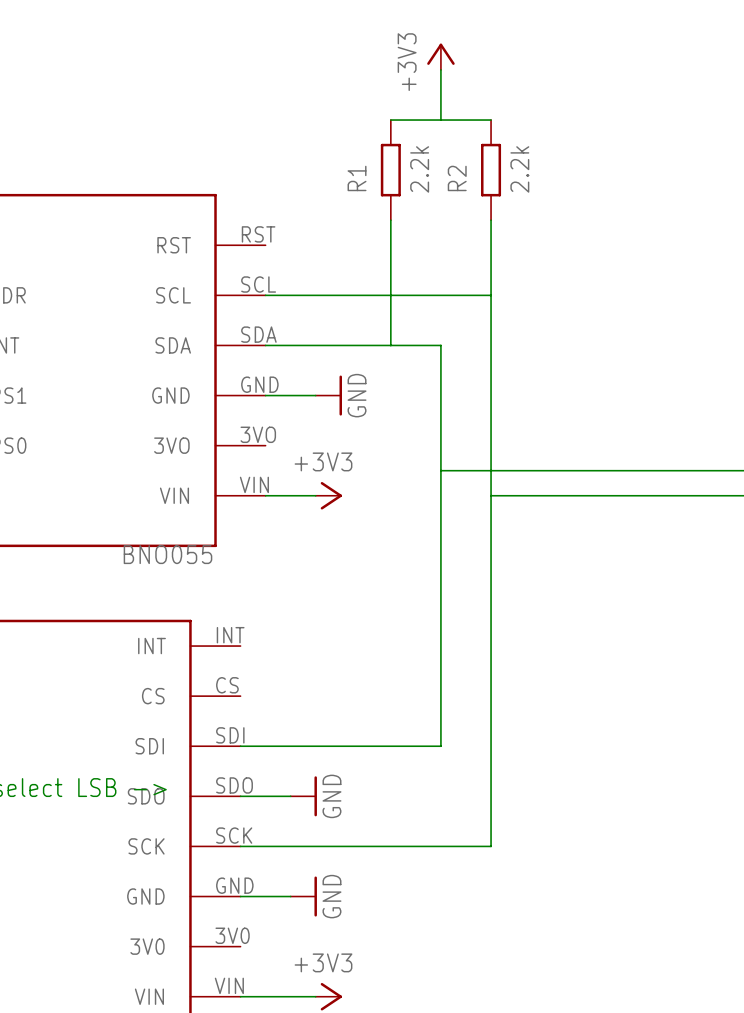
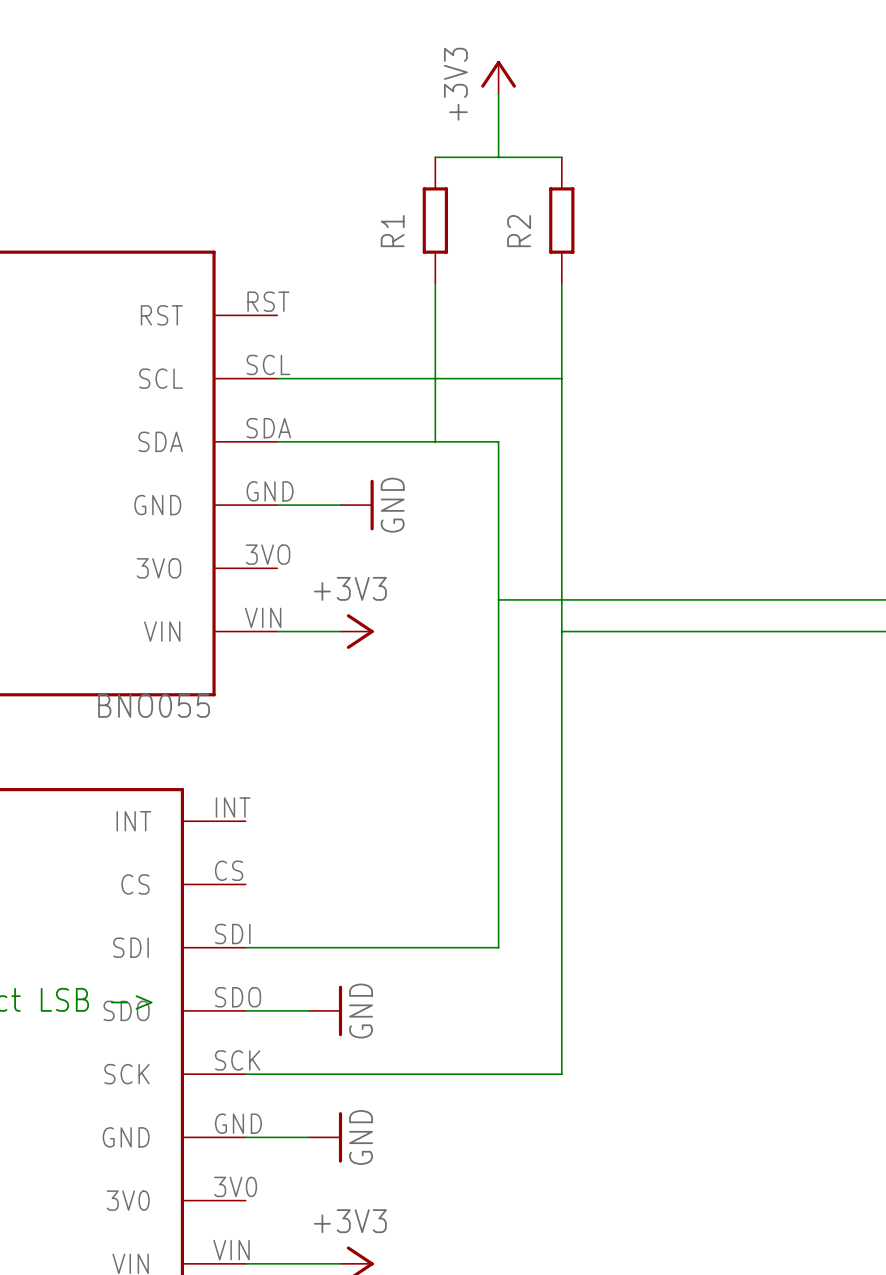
R1 value: 2.2k (419, 169) -> none
R2 value: 2.2k (519, 169) -> none

